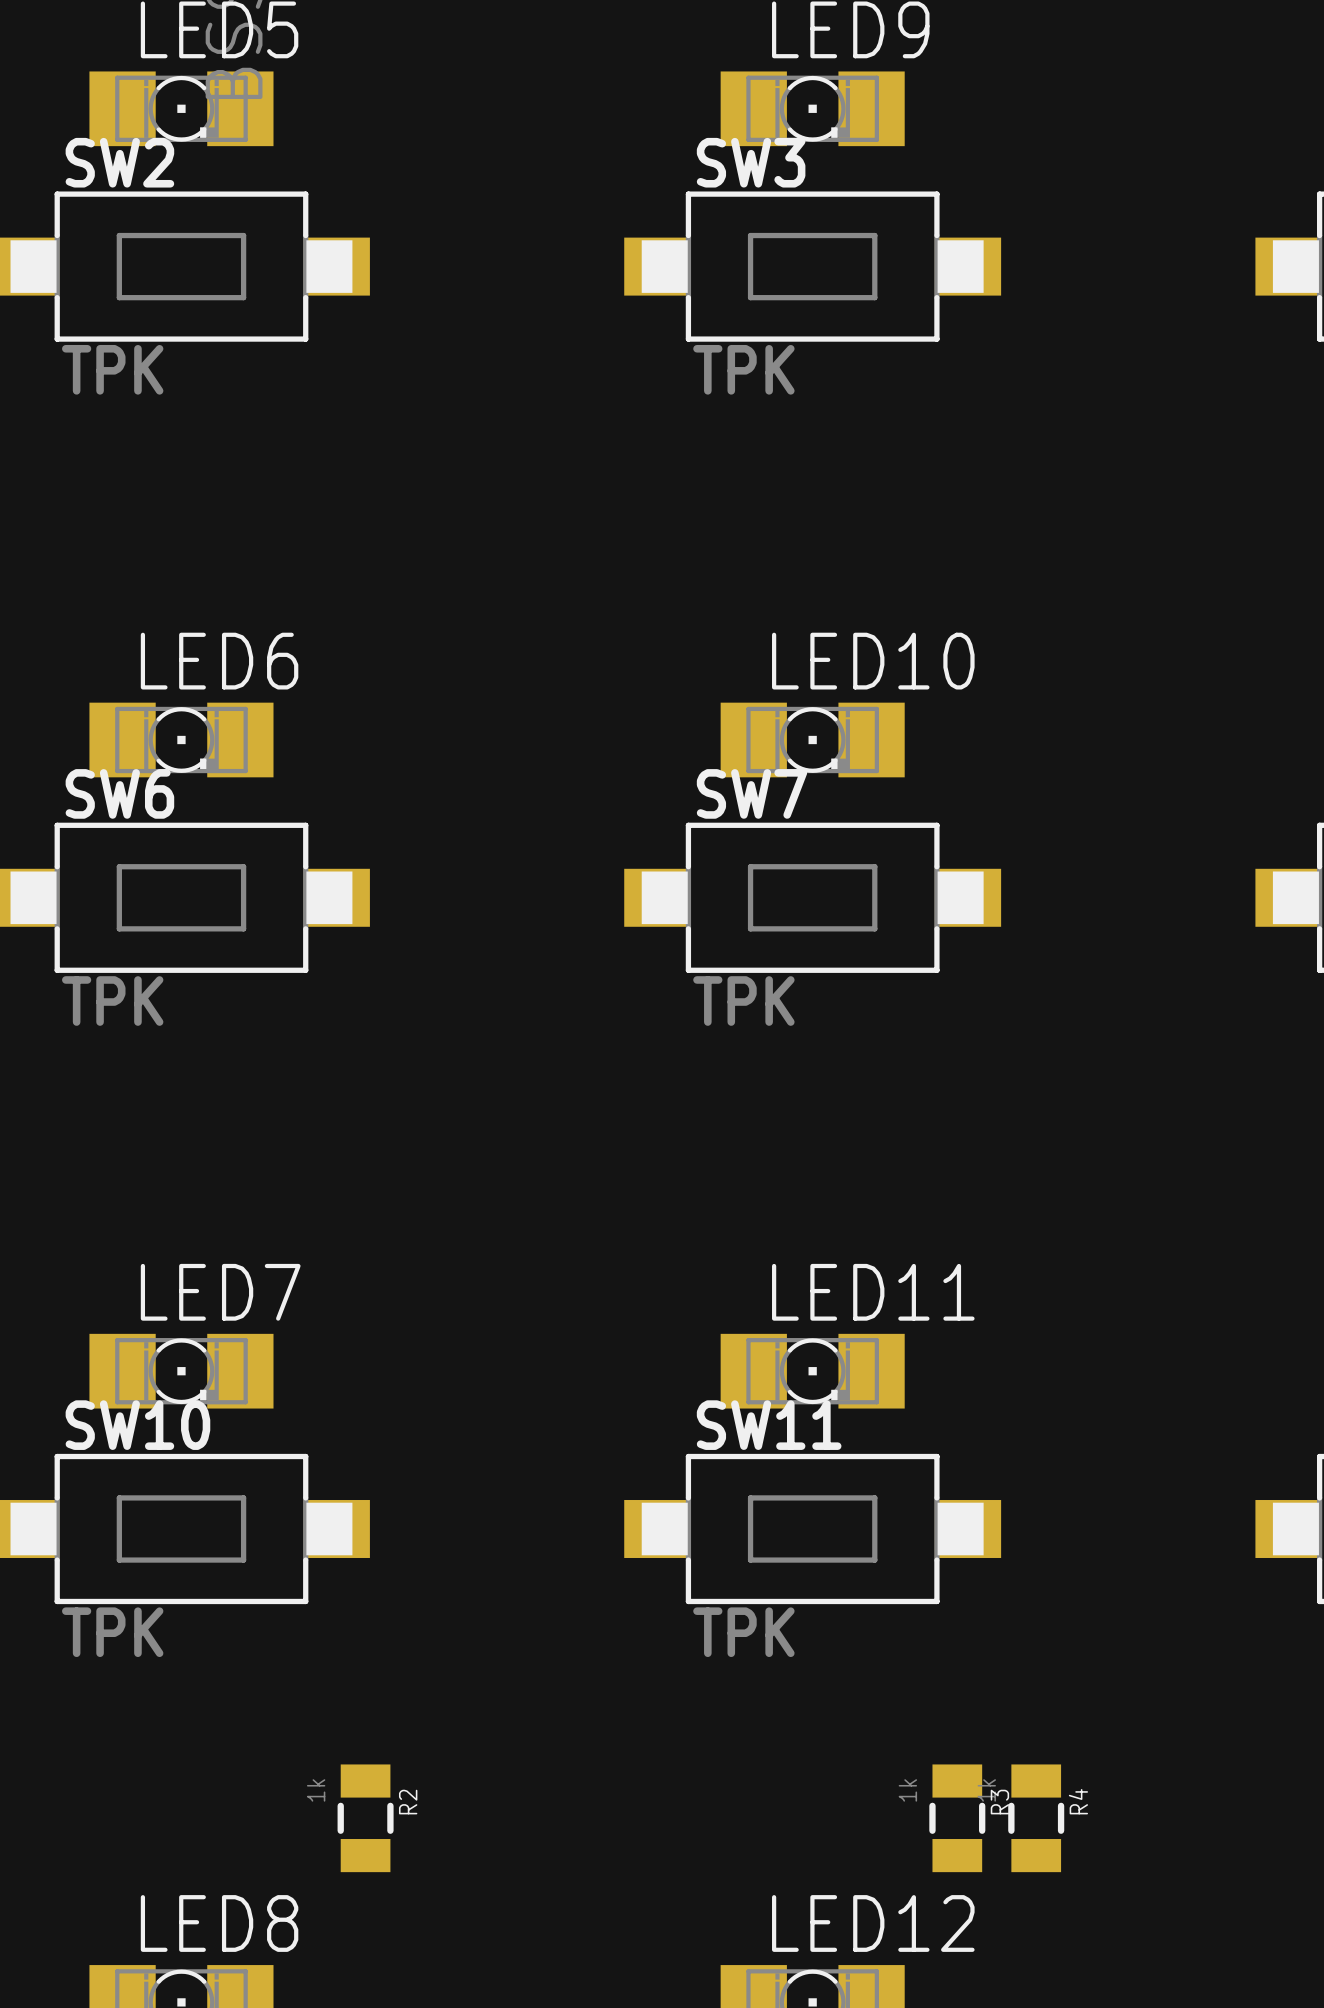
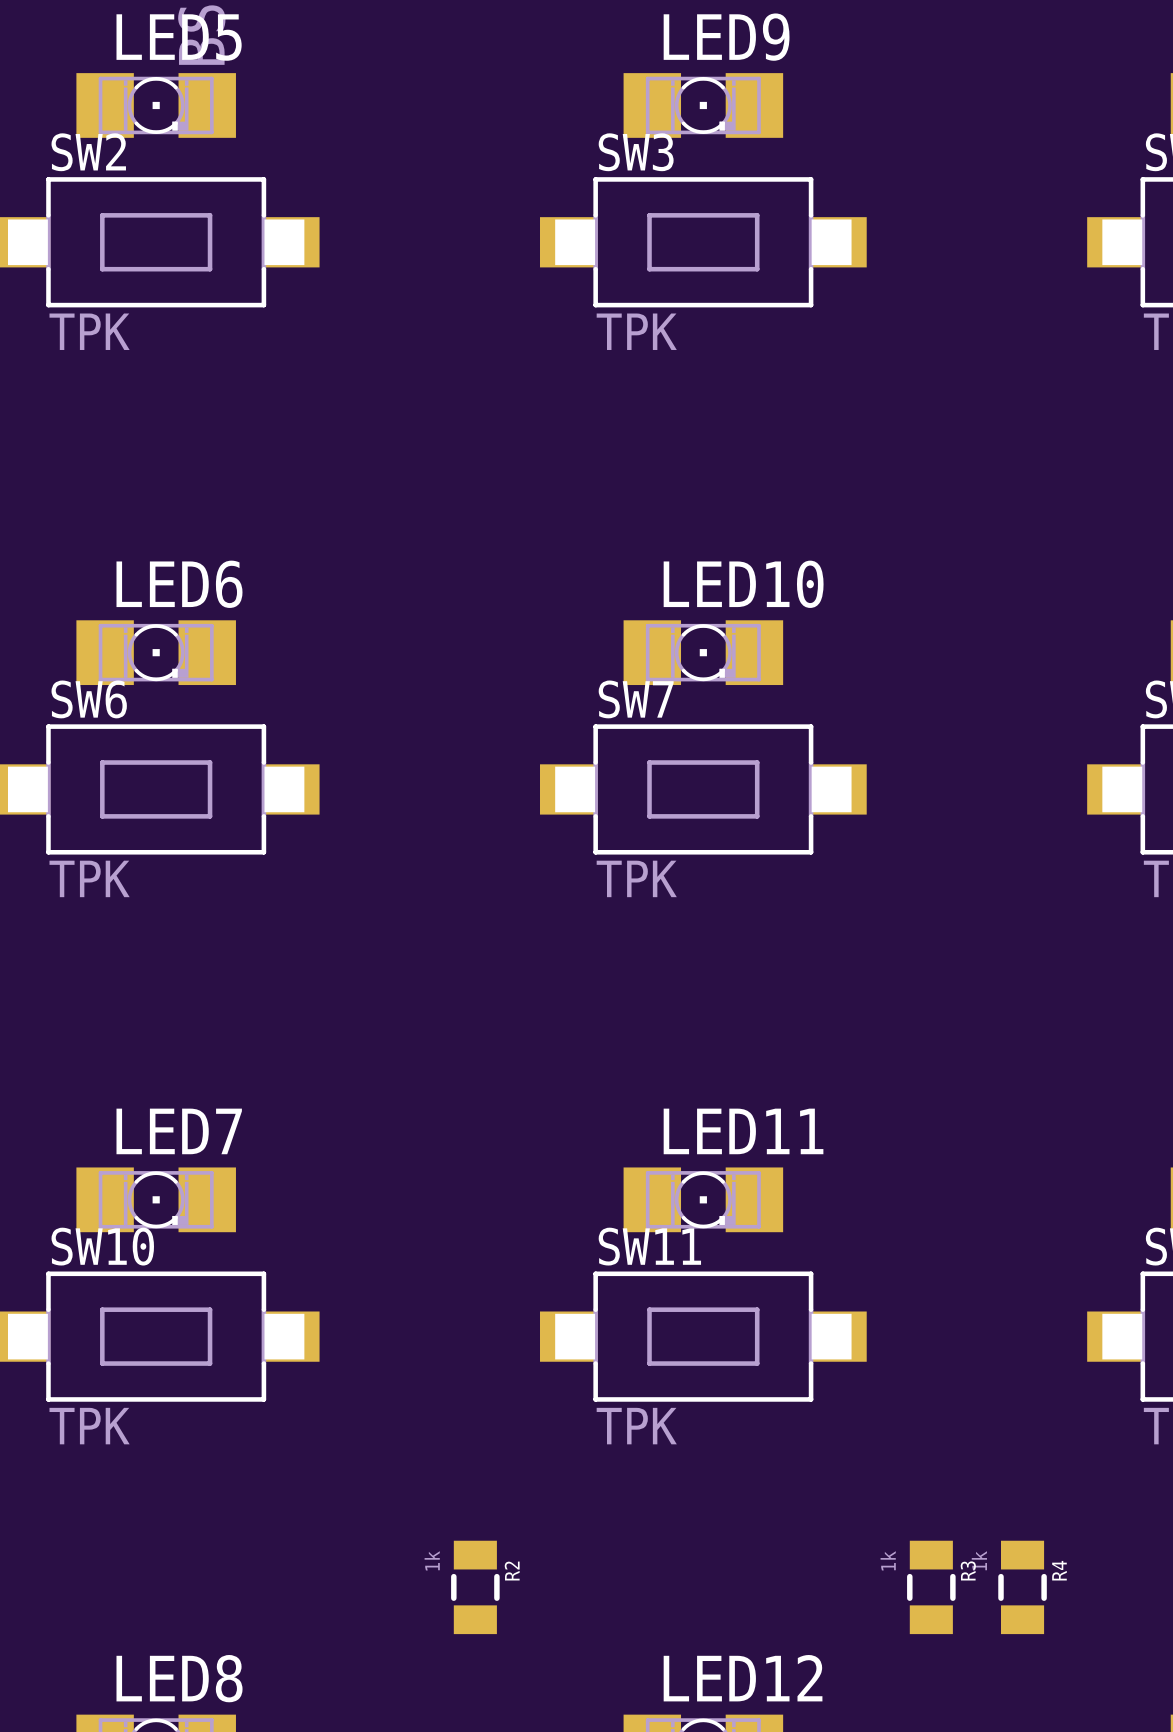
R2 position: (365, 1818) -> (475, 1587)
R3 position: (957, 1818) -> (931, 1587)
R4 position: (1036, 1818) -> (1022, 1587)

